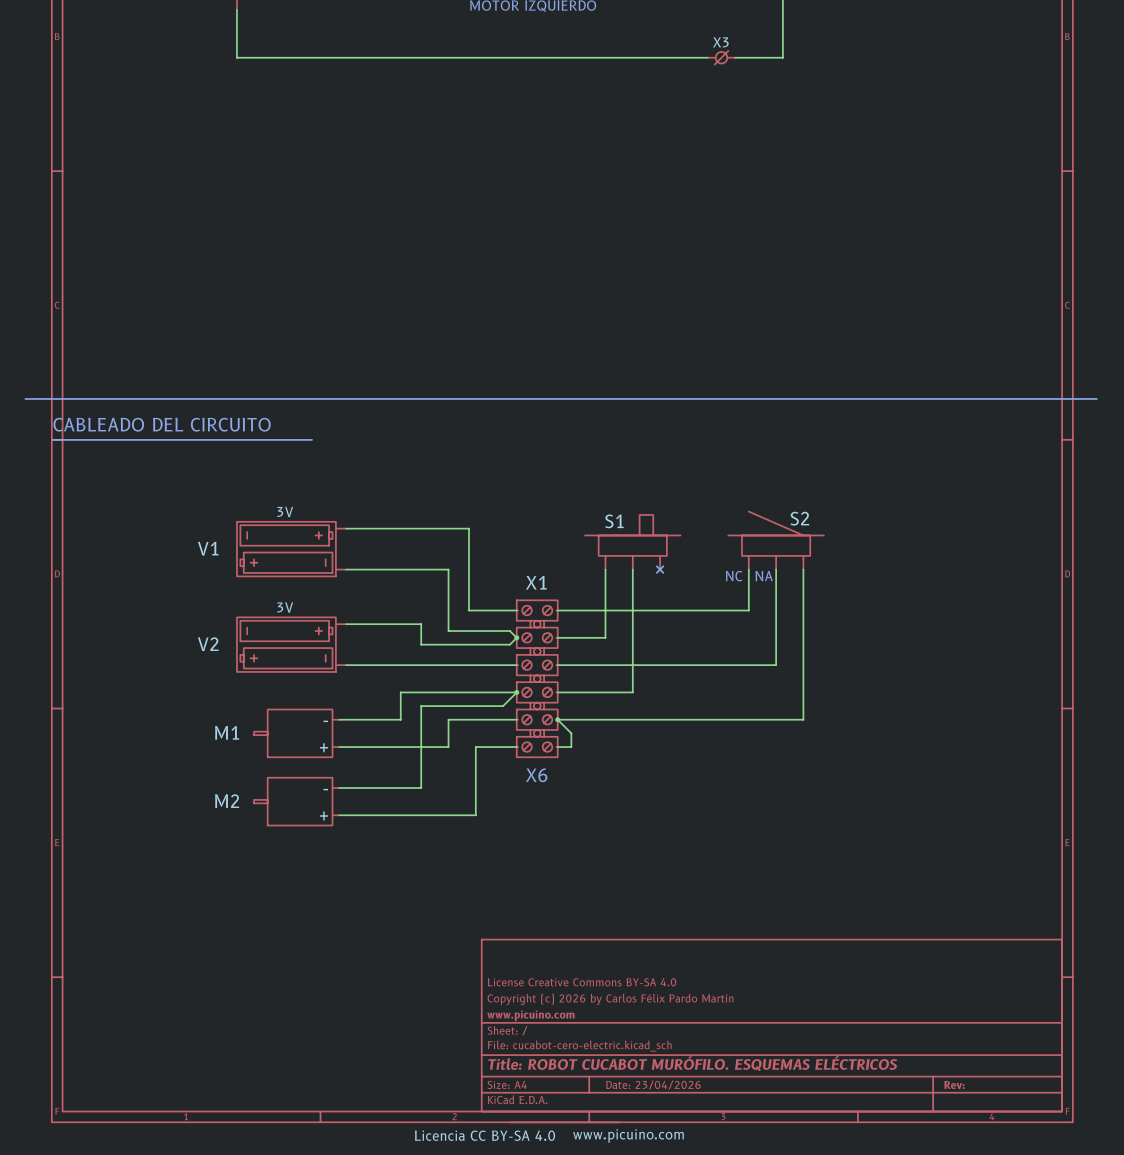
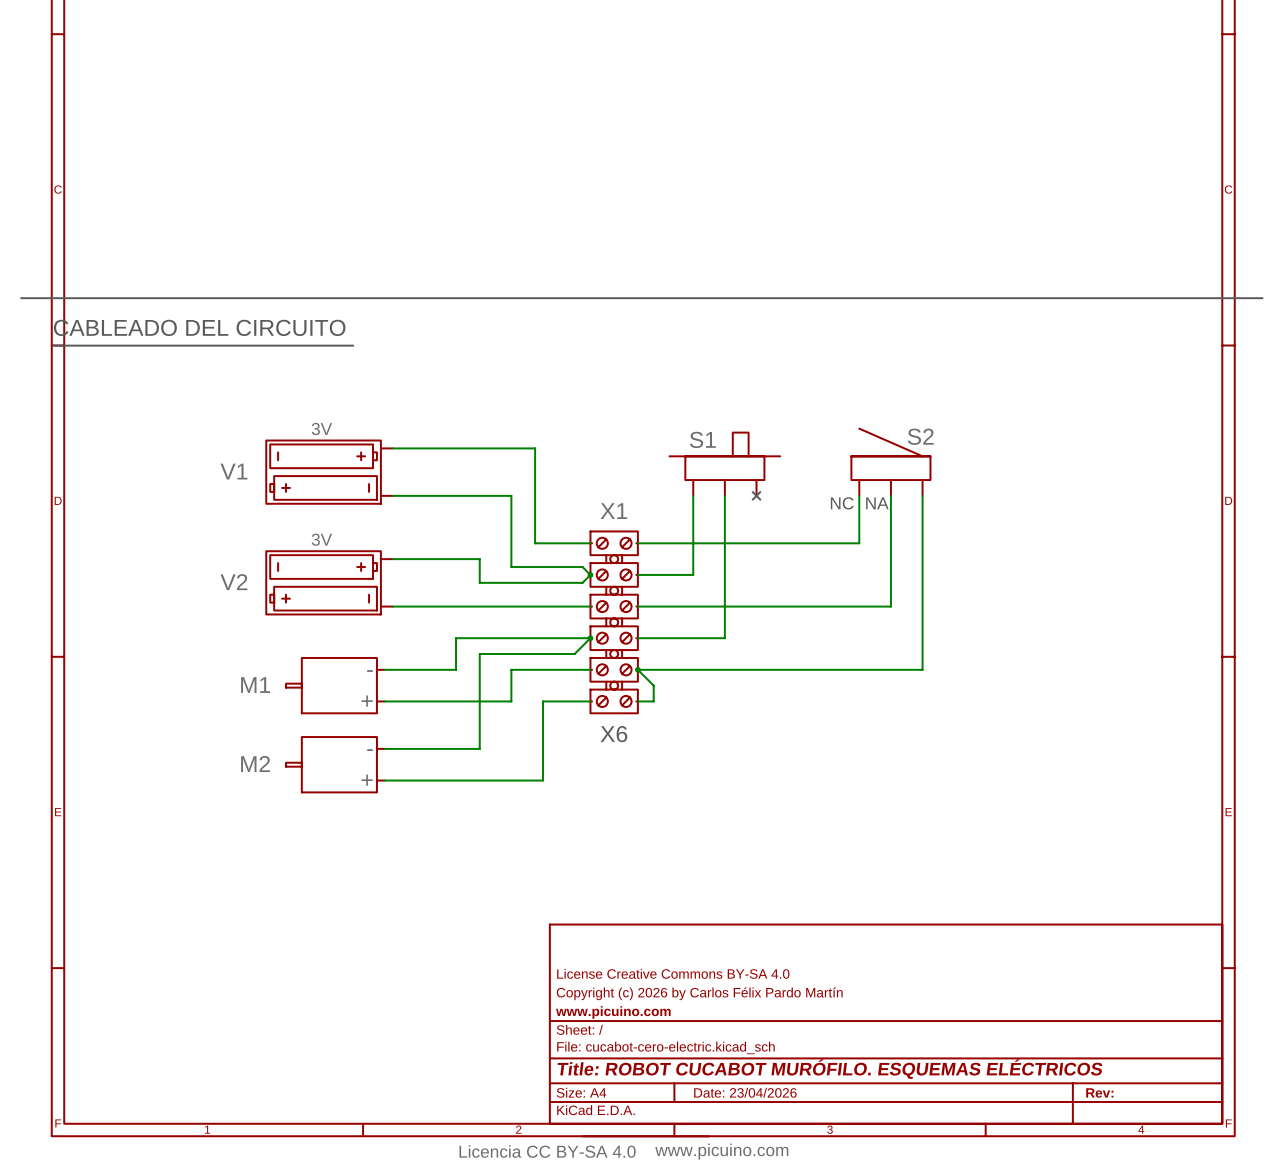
S2 symbol: [728, 511, 824, 570] -> [851, 428, 931, 496]

